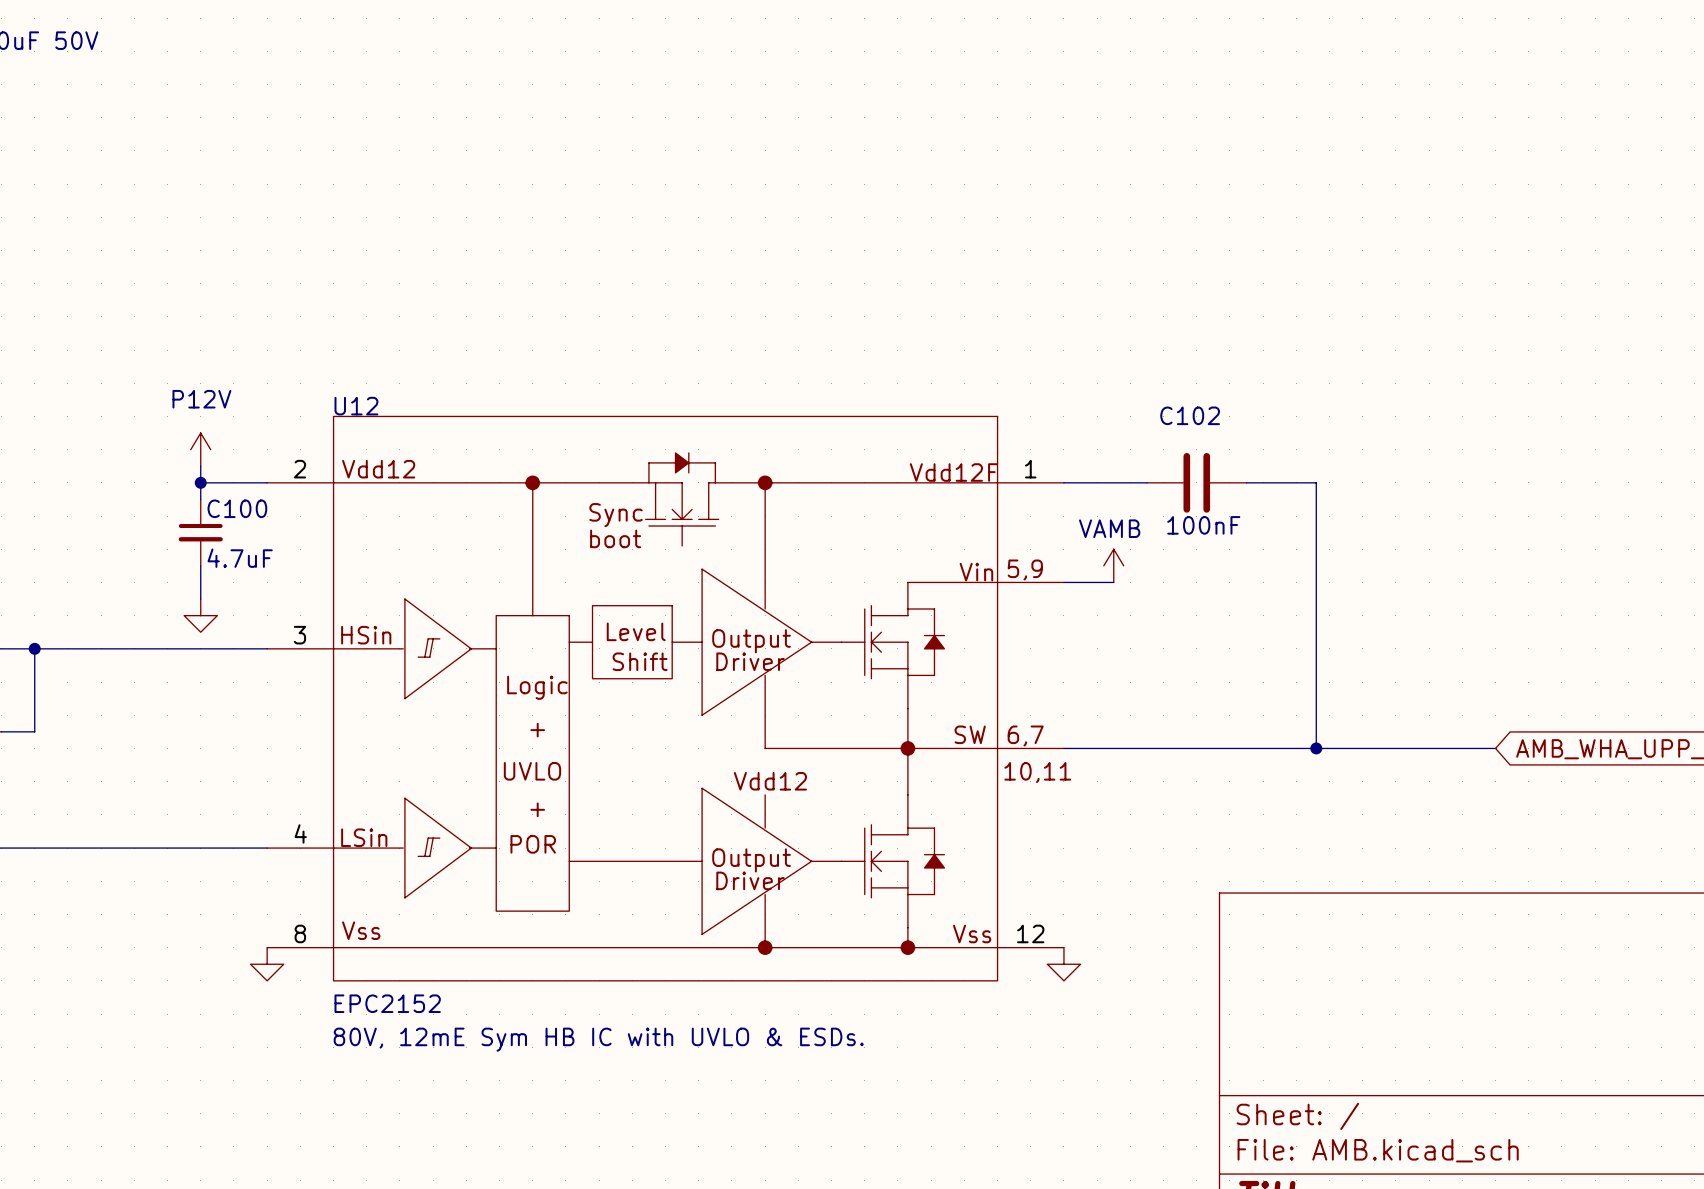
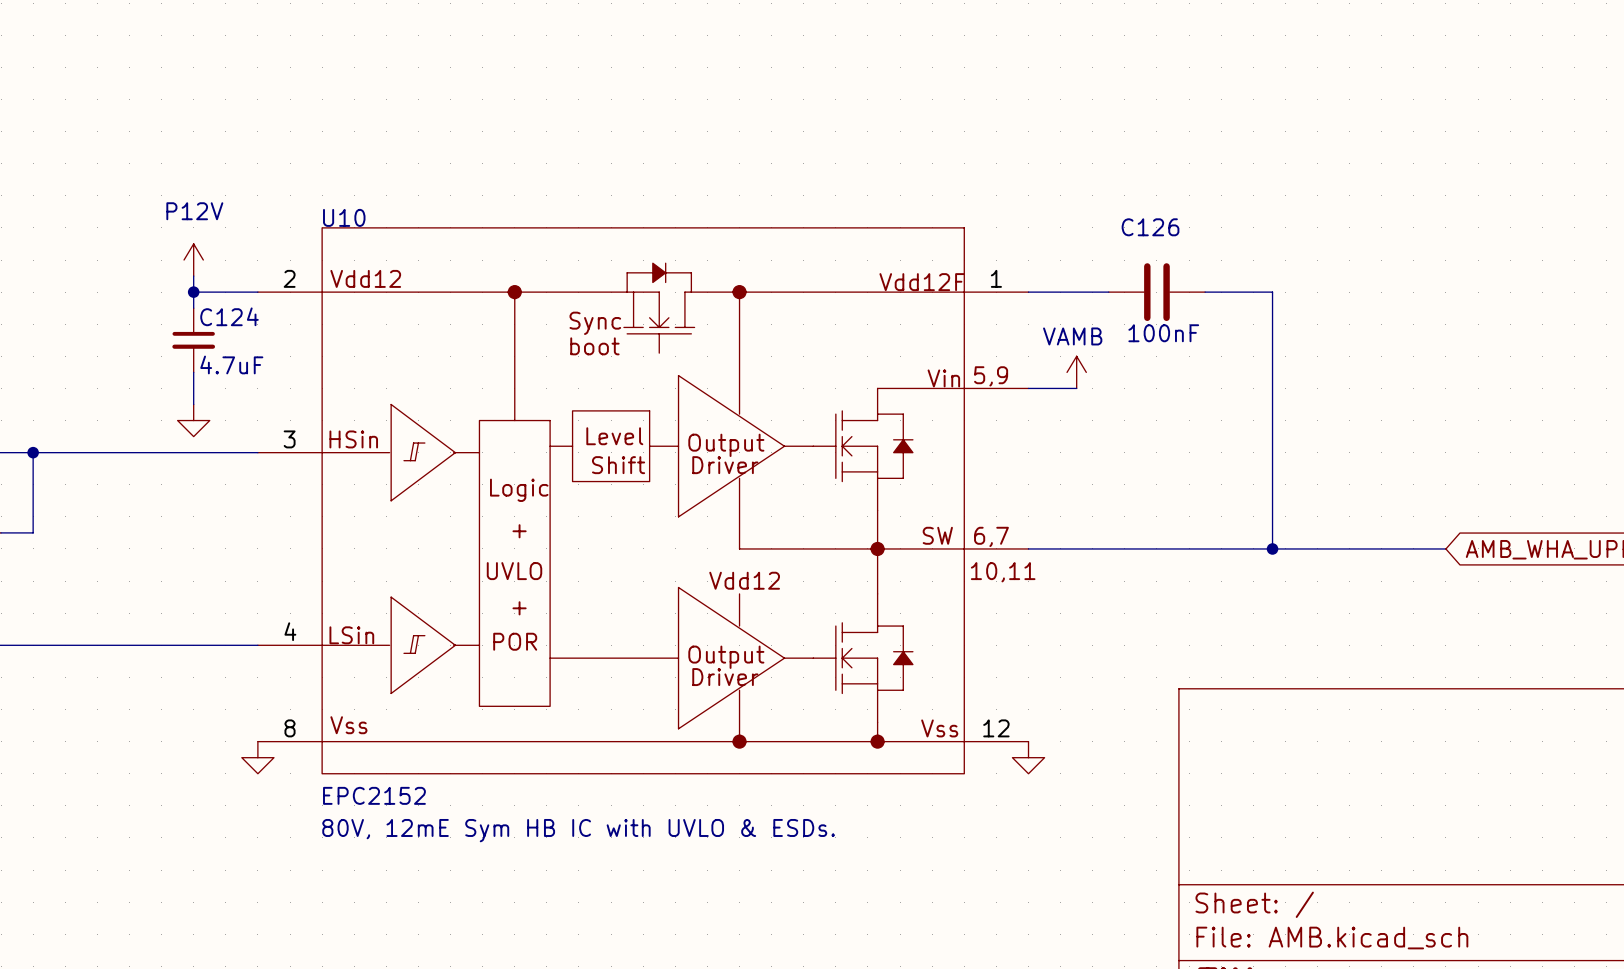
U12 name: U12 (356, 406) -> U10 (344, 217)
C102 name: C102 (1190, 415) -> C126 (1150, 227)
C100 name: C100 (237, 508) -> C124 (229, 316)

